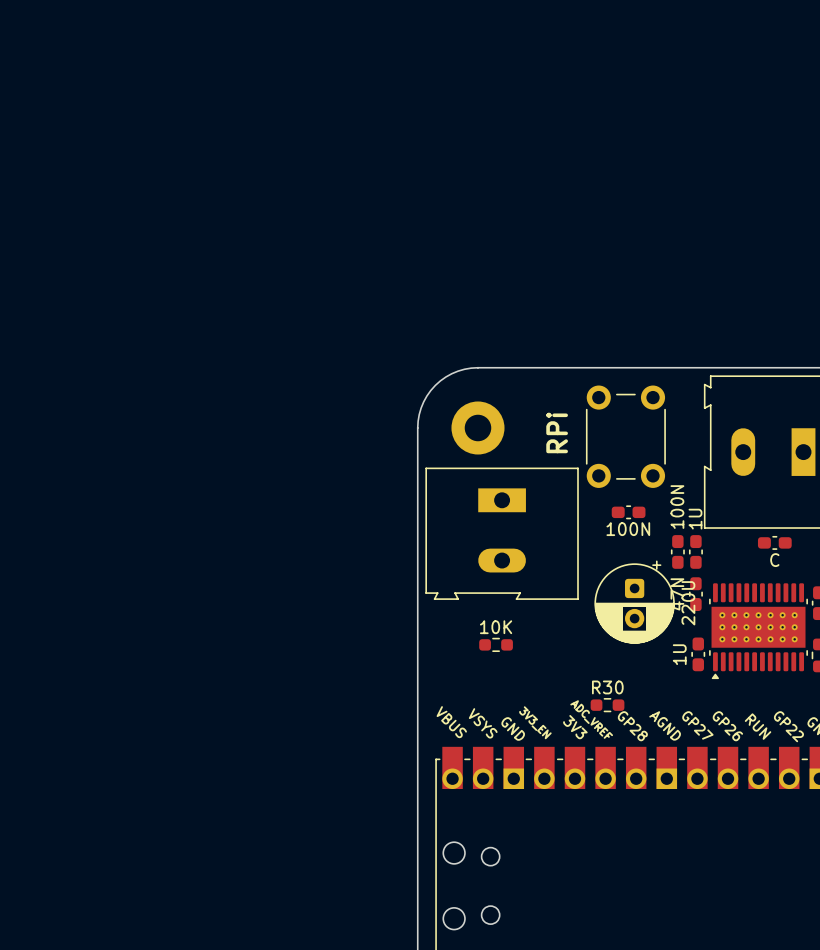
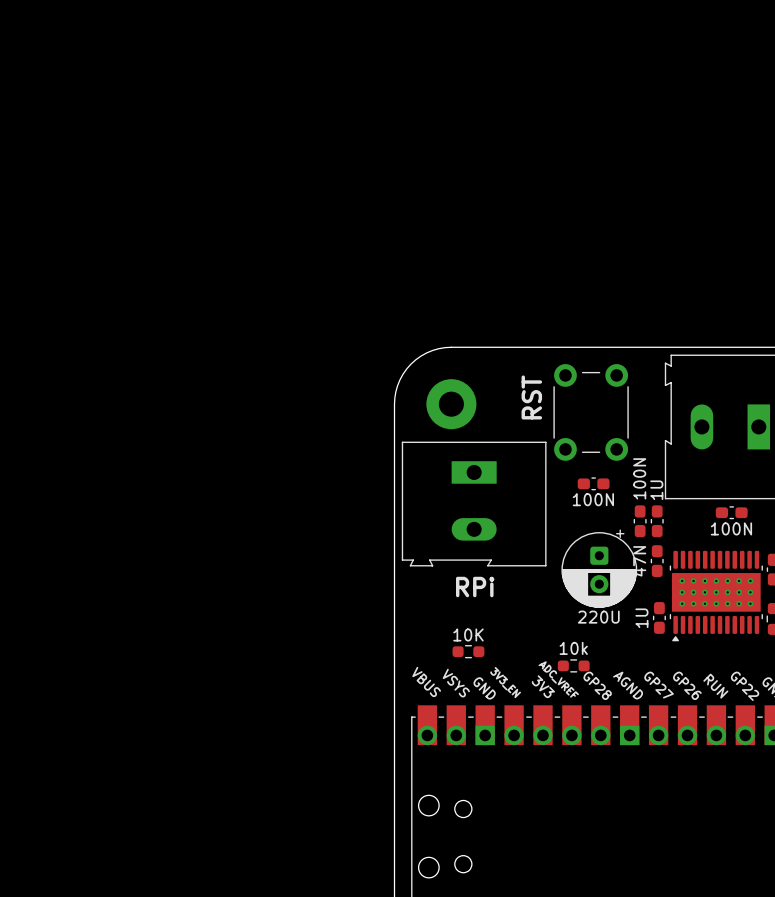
text: RPi (557, 432) -> RST (531, 397)
part value: C (774, 560) -> 100N (731, 528)
part value rotation: 0° (688, 603) -> 90° clockwise (598, 617)
part value position: 220U (688, 603) -> 220U (598, 617)
text: none -> RPi (475, 587)
part position: (496, 644) -> (468, 651)
R30 value: none -> 10k (573, 648)
R30 name: R30 (607, 687) -> none

